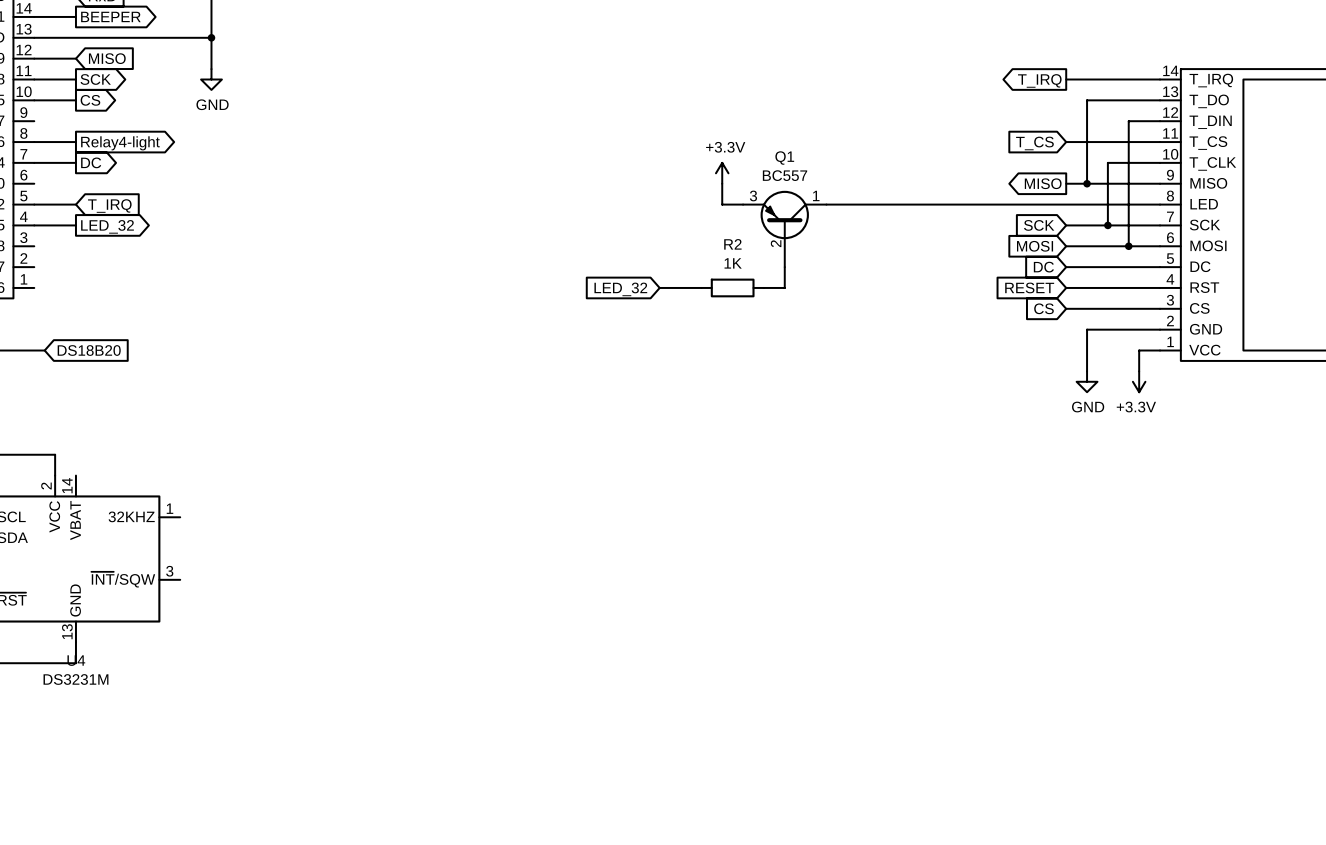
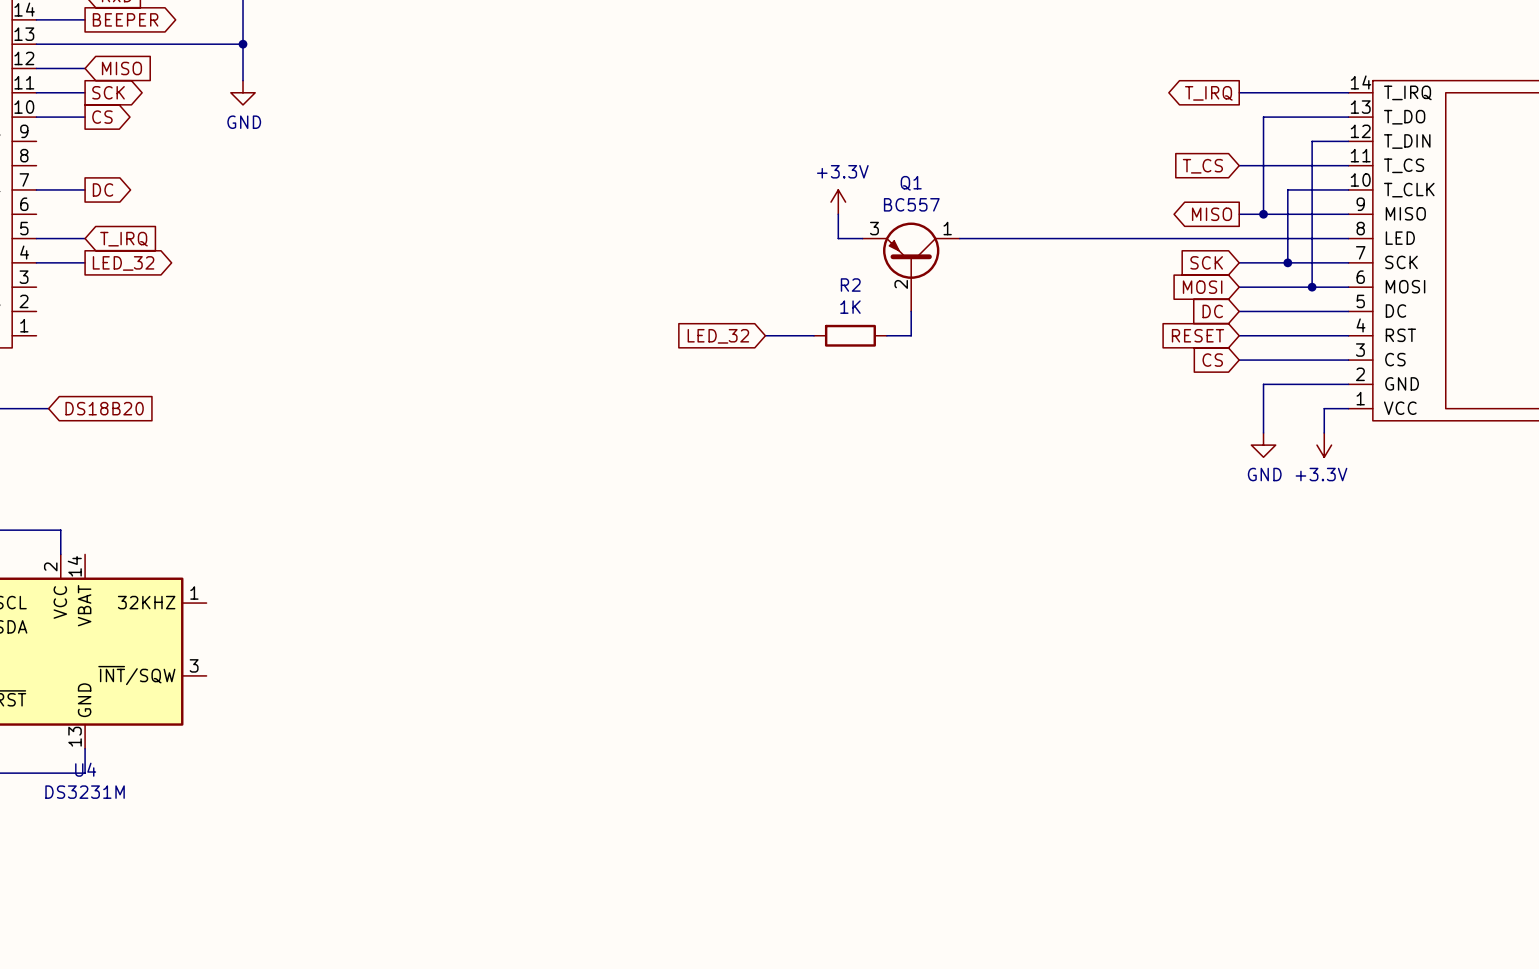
wire: (34, 142) (75, 142) -> none
global label: Relay4-light (120, 143) -> none

